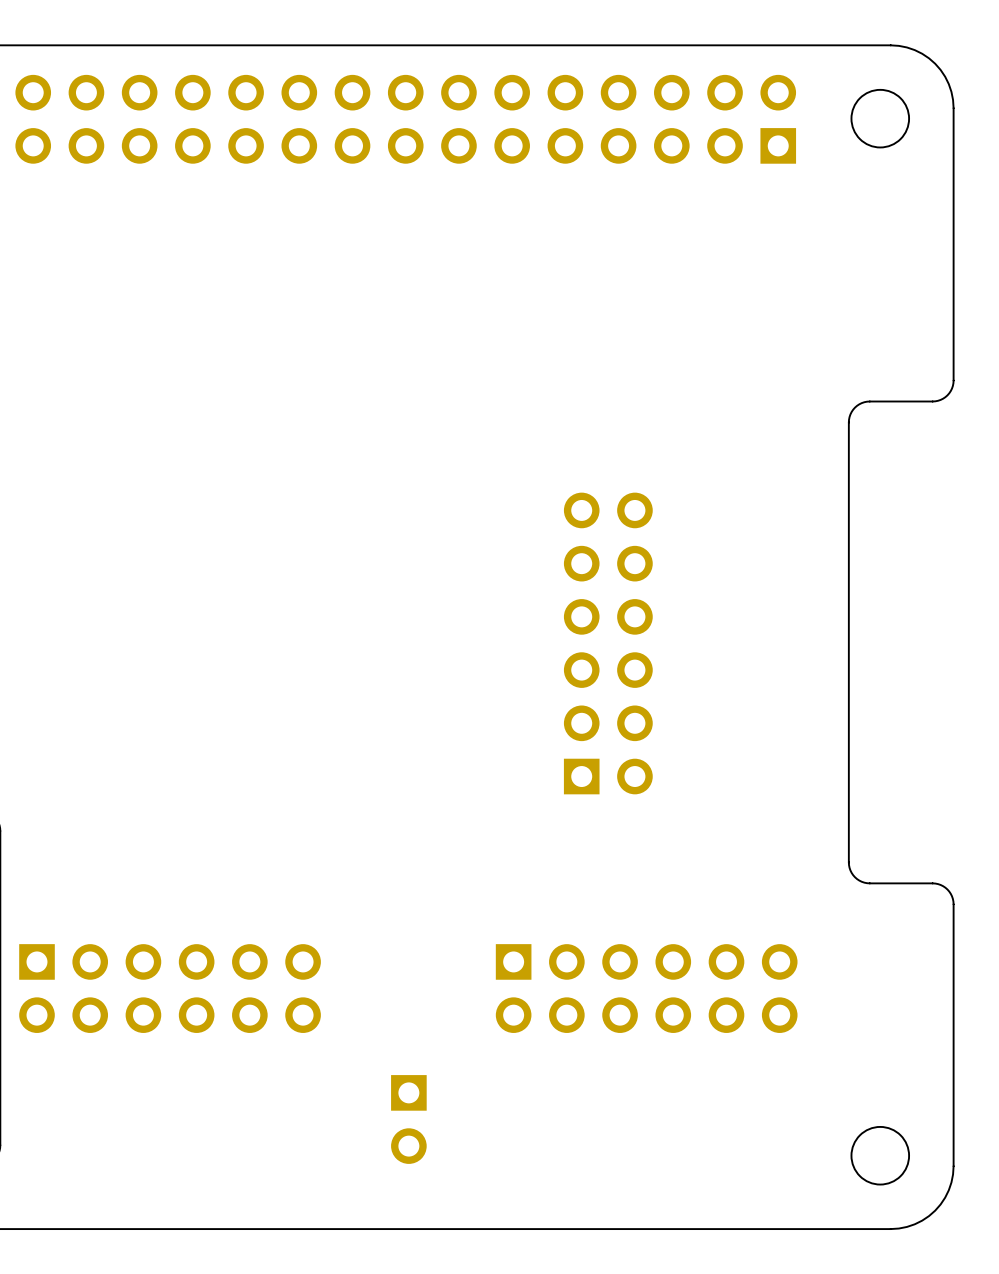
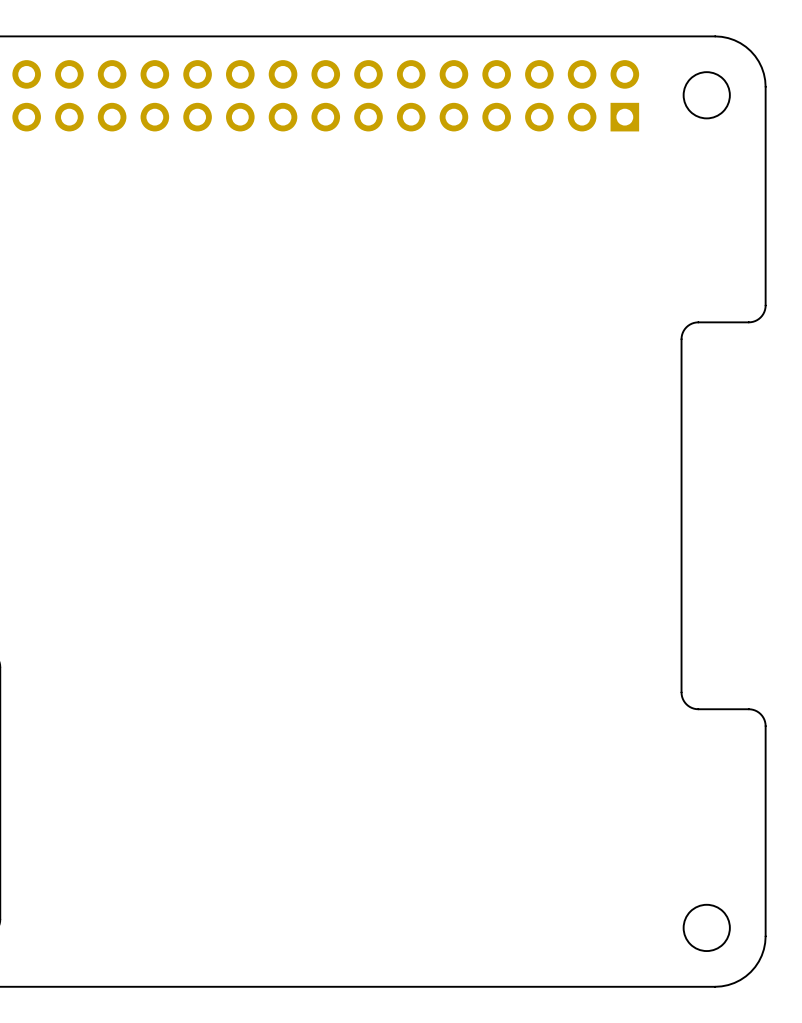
part: (608, 643) -> none
part: (170, 988) -> none
part: (646, 988) -> none
part: (408, 1119) -> none

